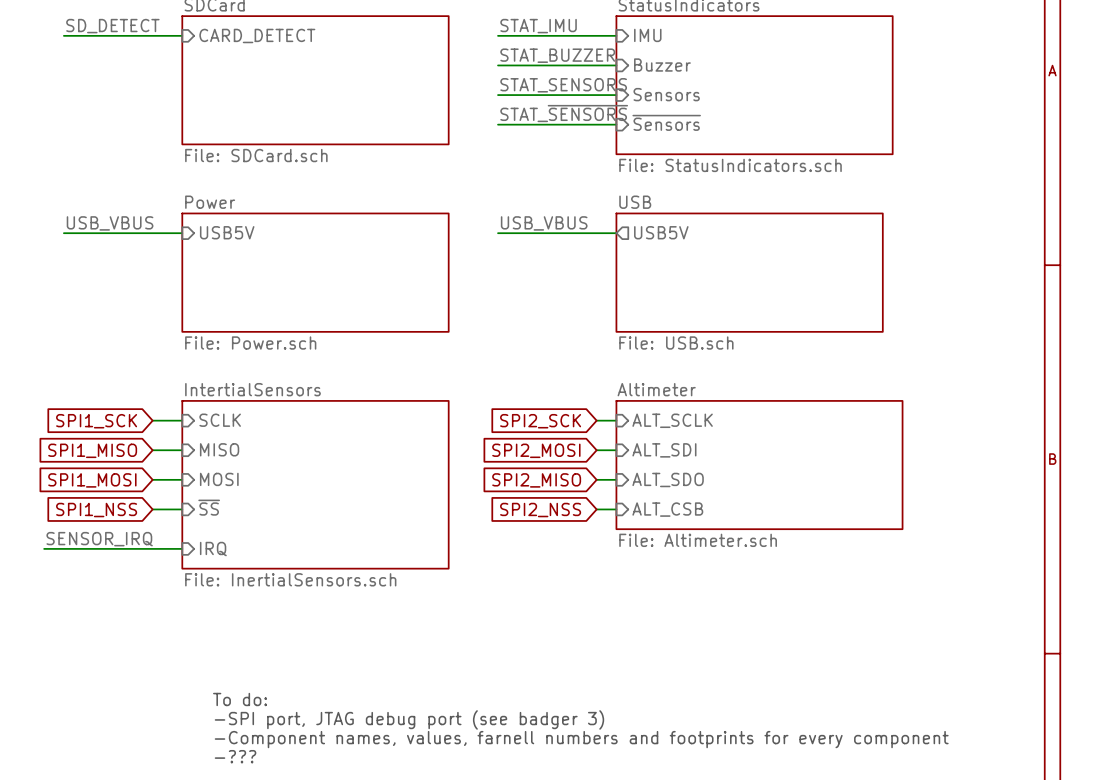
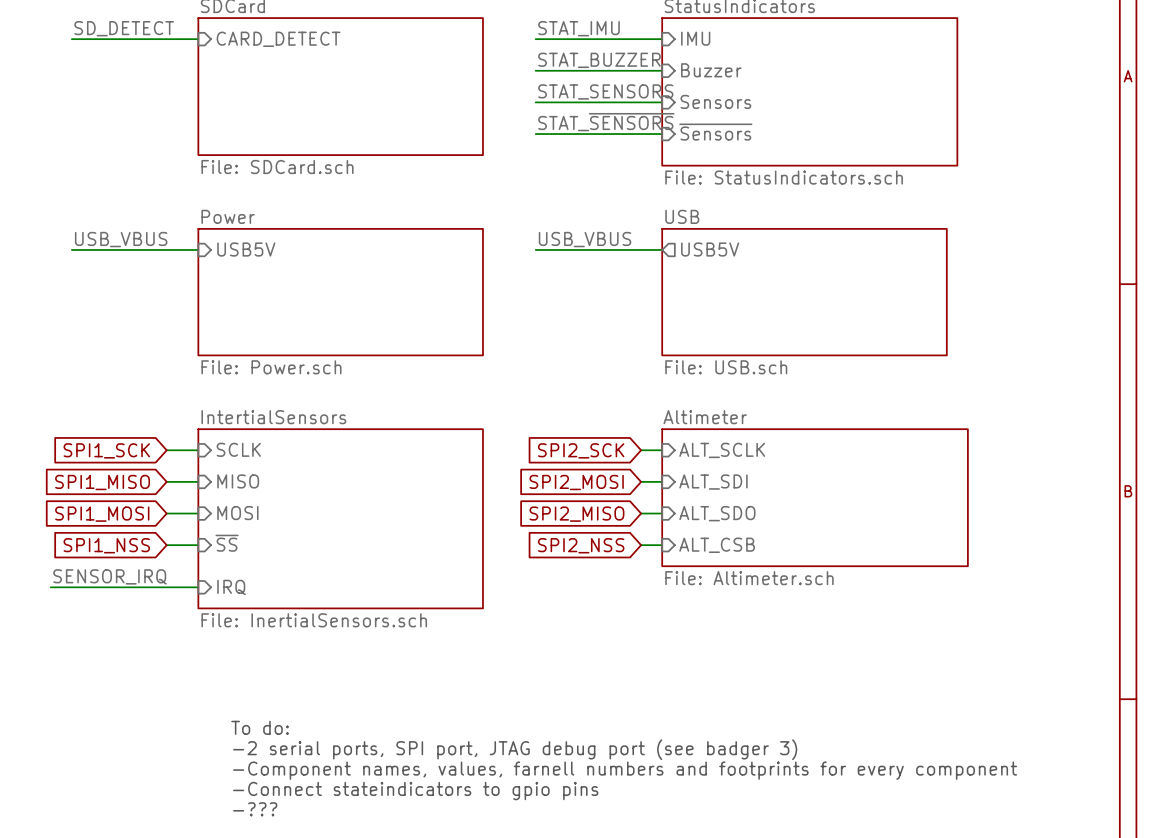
text: none -> To do: (260, 727)
text: To do: (240, 699) -> -2 serial ports, SPI port, JTAG debug port (see badger 3) (515, 749)
text: -SPI port, JTAG debug port (see badger 3) (409, 719) -> -Component names, values, farnell numbers and footprints for every component (625, 770)
text: -Component names, values, farnell numbers and footprints for every component (581, 739) -> -Connect stateindicators to gpio pins (415, 791)

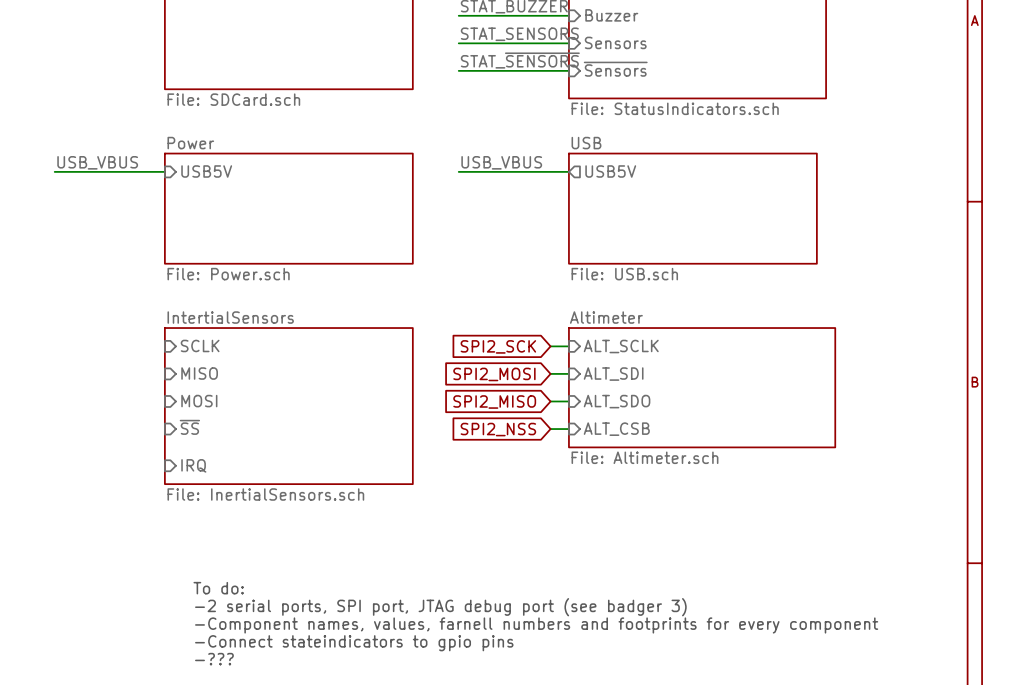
global label: SPI1_SCK (106, 450) -> none
wire: (166, 450) (198, 450) -> none
wire: (166, 481) (198, 481) -> none
global label: SPI1_MISO (102, 482) -> none
wire: (166, 513) (198, 513) -> none
global label: SPI1_MOSI (102, 514) -> none
global label: SPI1_NSS (106, 545) -> none
wire: (166, 545) (198, 545) -> none
label: SENSOR_IRQ (110, 576) -> none
wire: (50, 587) (198, 587) -> none

